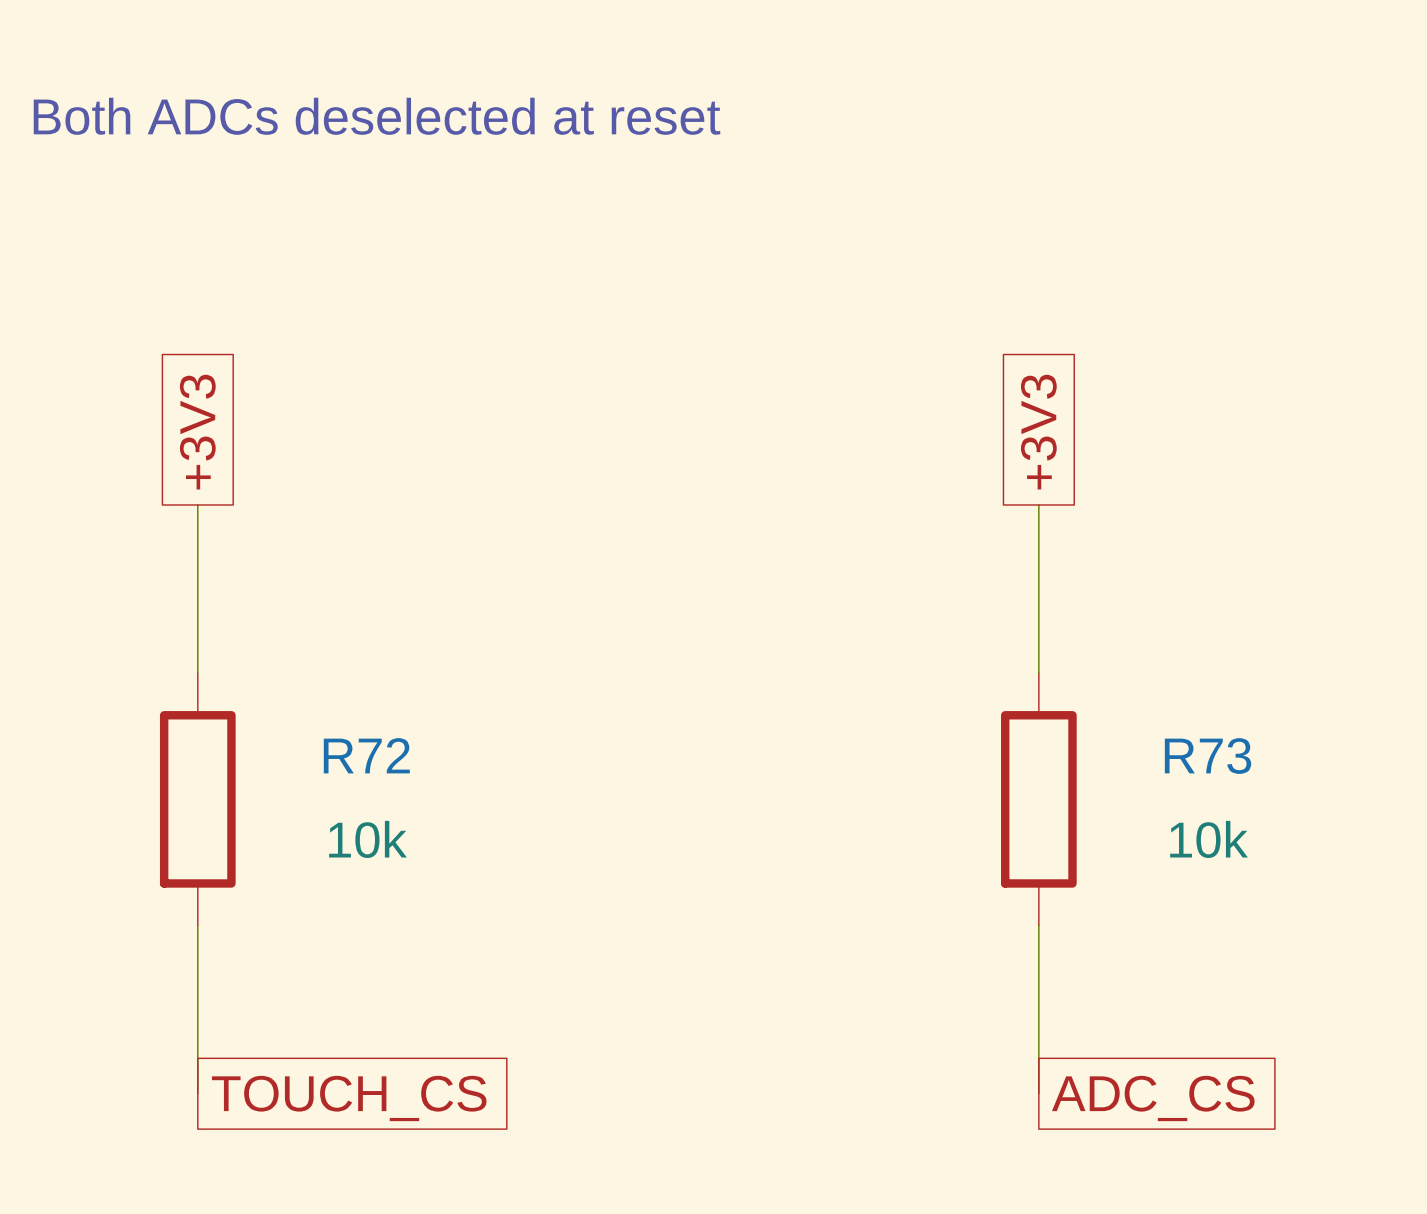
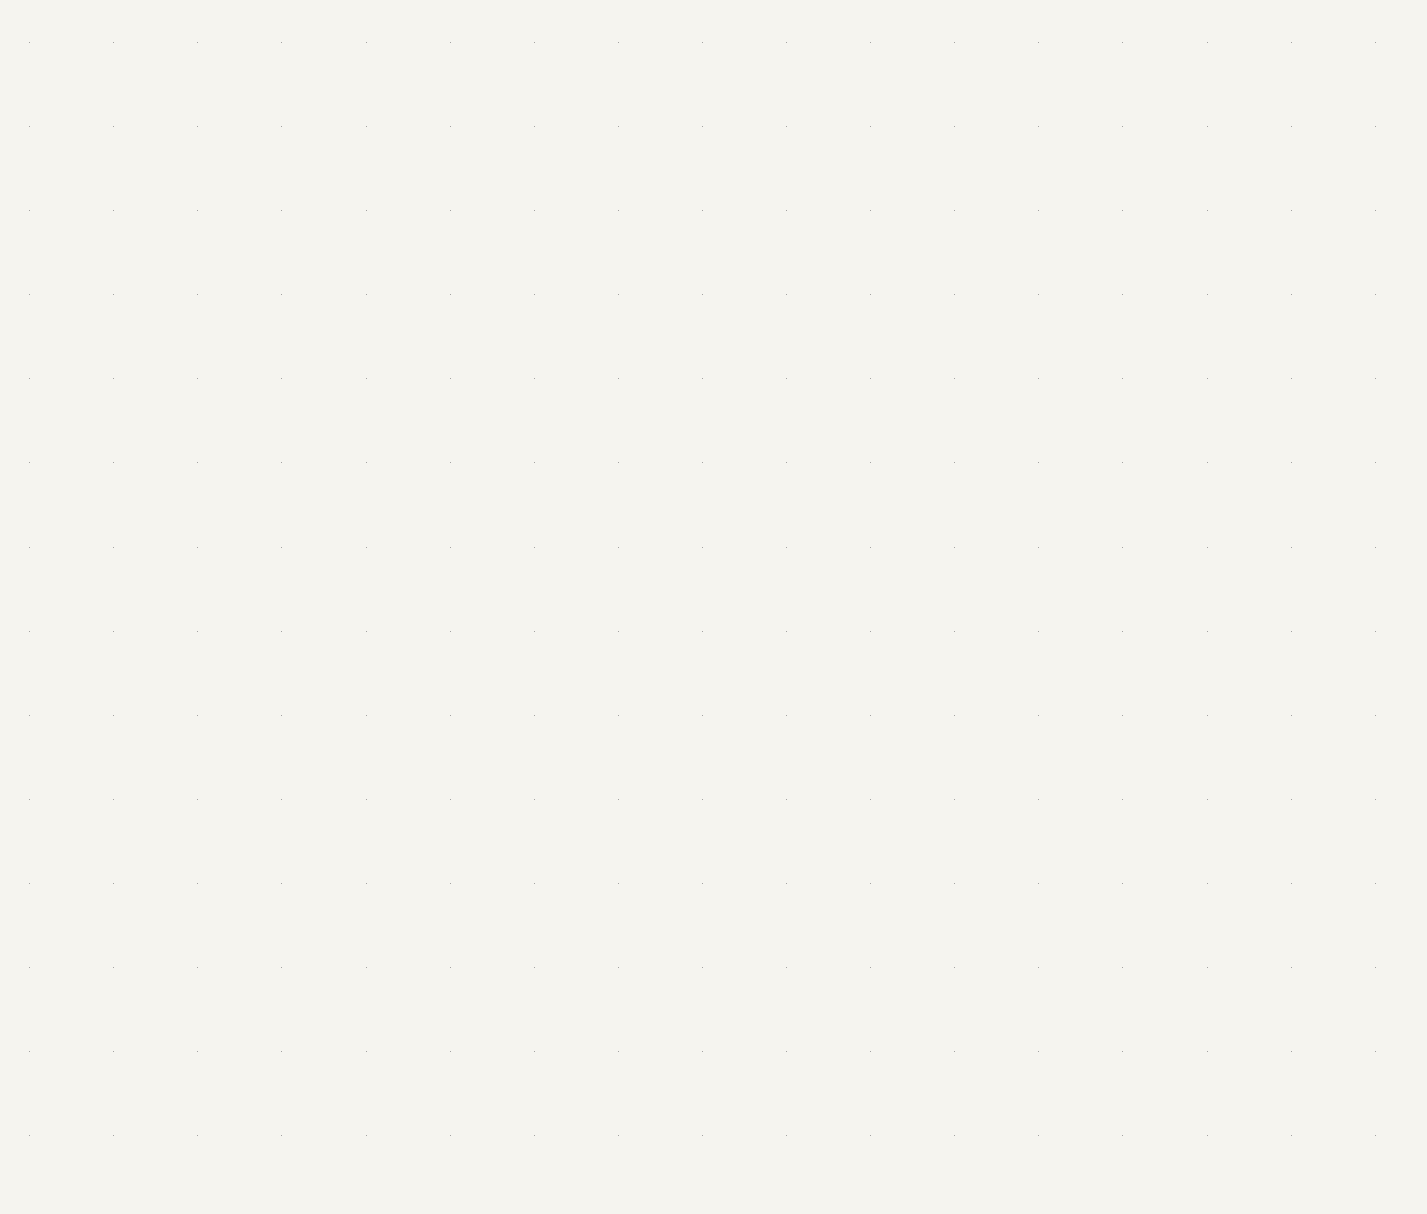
text: Both ADCs deselected at reset (376, 116) -> none
global label: +3V3 (197, 432) -> none
global label: +3V3 (1038, 432) -> none
wire: (197, 505) (197, 673) -> none
wire: (1038, 505) (1038, 673) -> none
R72: 10k (197, 799) -> none
R73: 10k (1038, 799) -> none
wire: (197, 925) (197, 1093) -> none
wire: (1038, 925) (1038, 1093) -> none
global label: TOUCH_CS (349, 1098) -> none
global label: ADC_CS (1153, 1098) -> none

